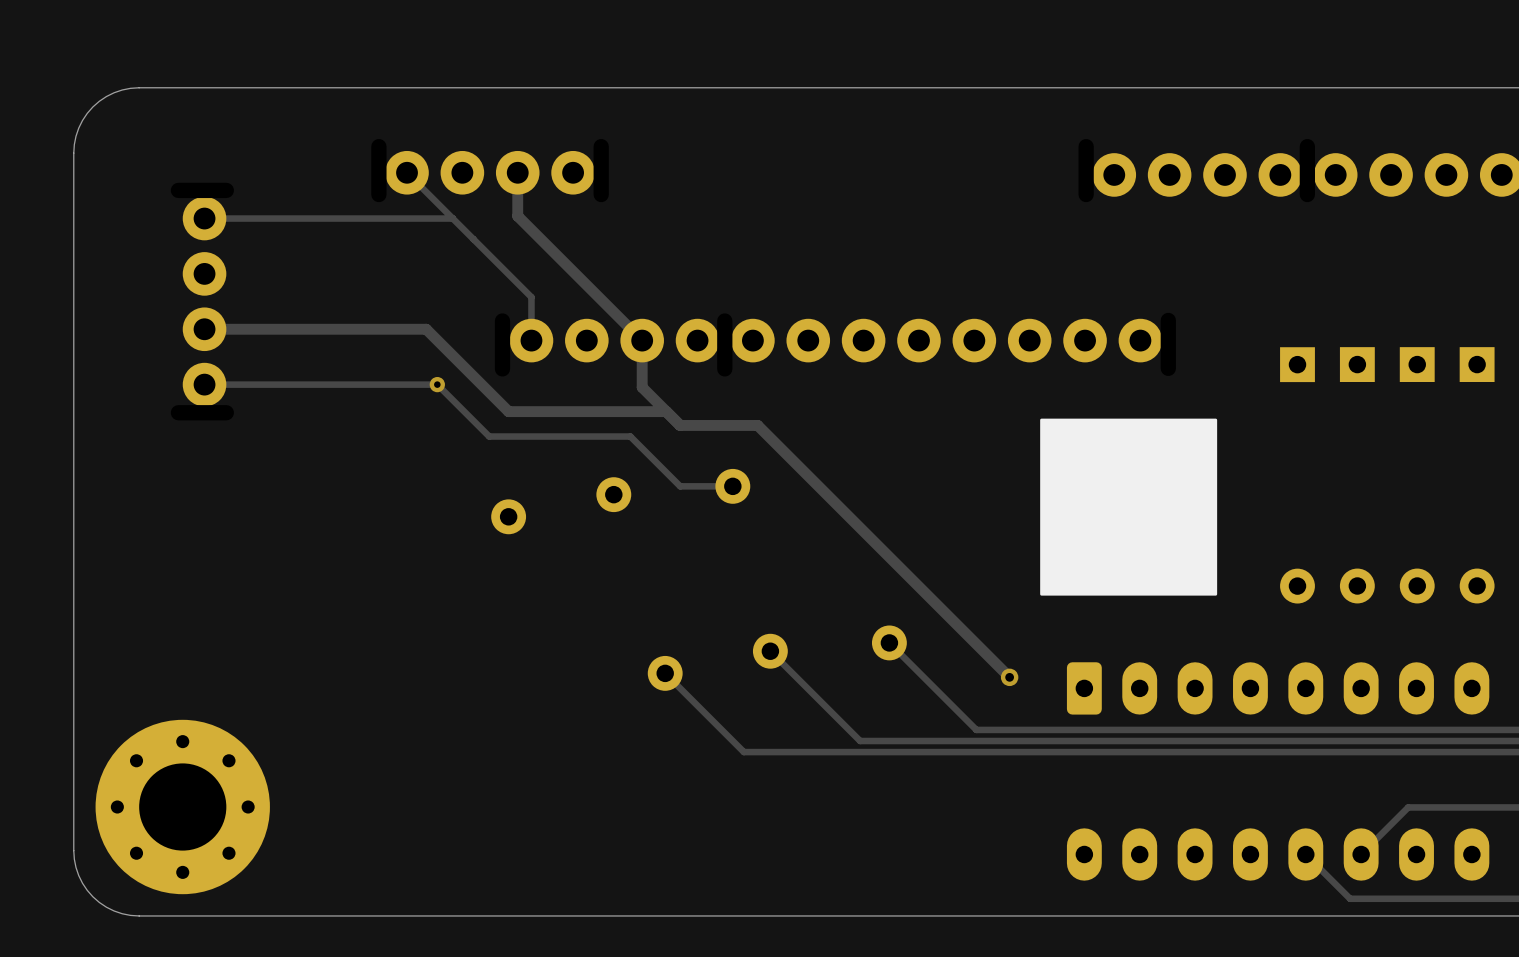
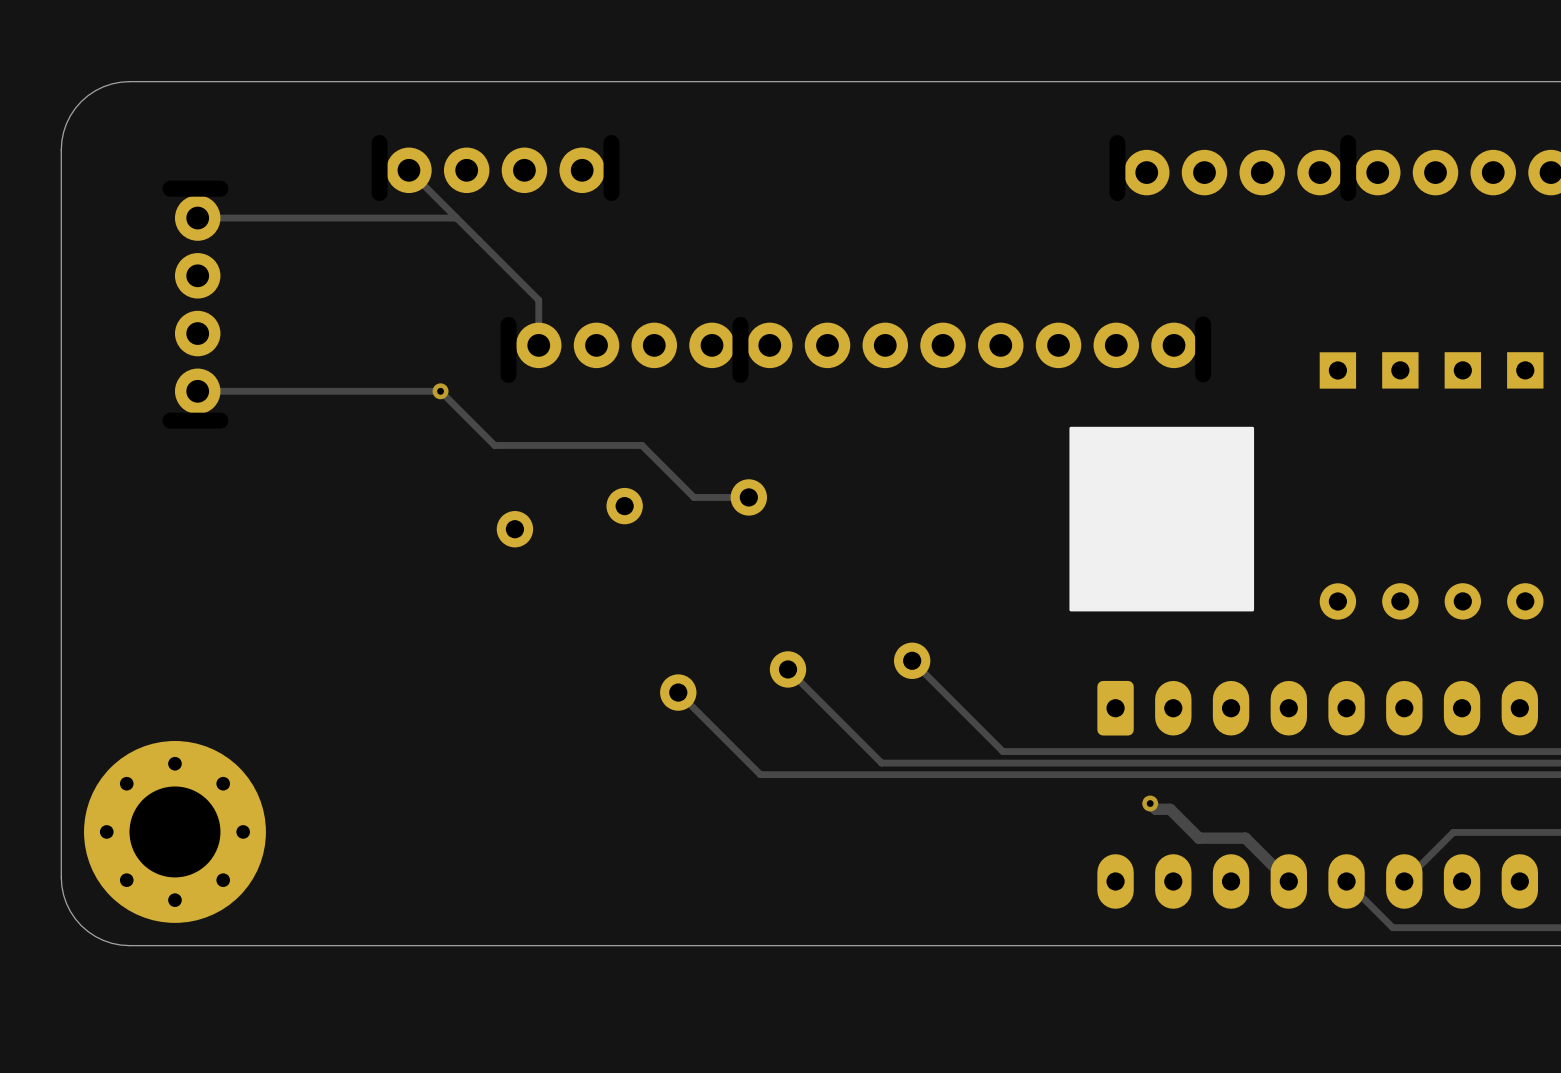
track: (517, 172) (517, 216) (642, 340) (642, 387) (680, 425) (757, 425) (1009, 677) -> none
track: (204, 329) (426, 329) (508, 411) (666, 411) -> none
via: (1009, 677) -> none
track: none -> (1150, 803) (1155, 809) (1170, 809) (1199, 838) (1245, 838) (1288, 881)
via: none -> (1150, 803)

